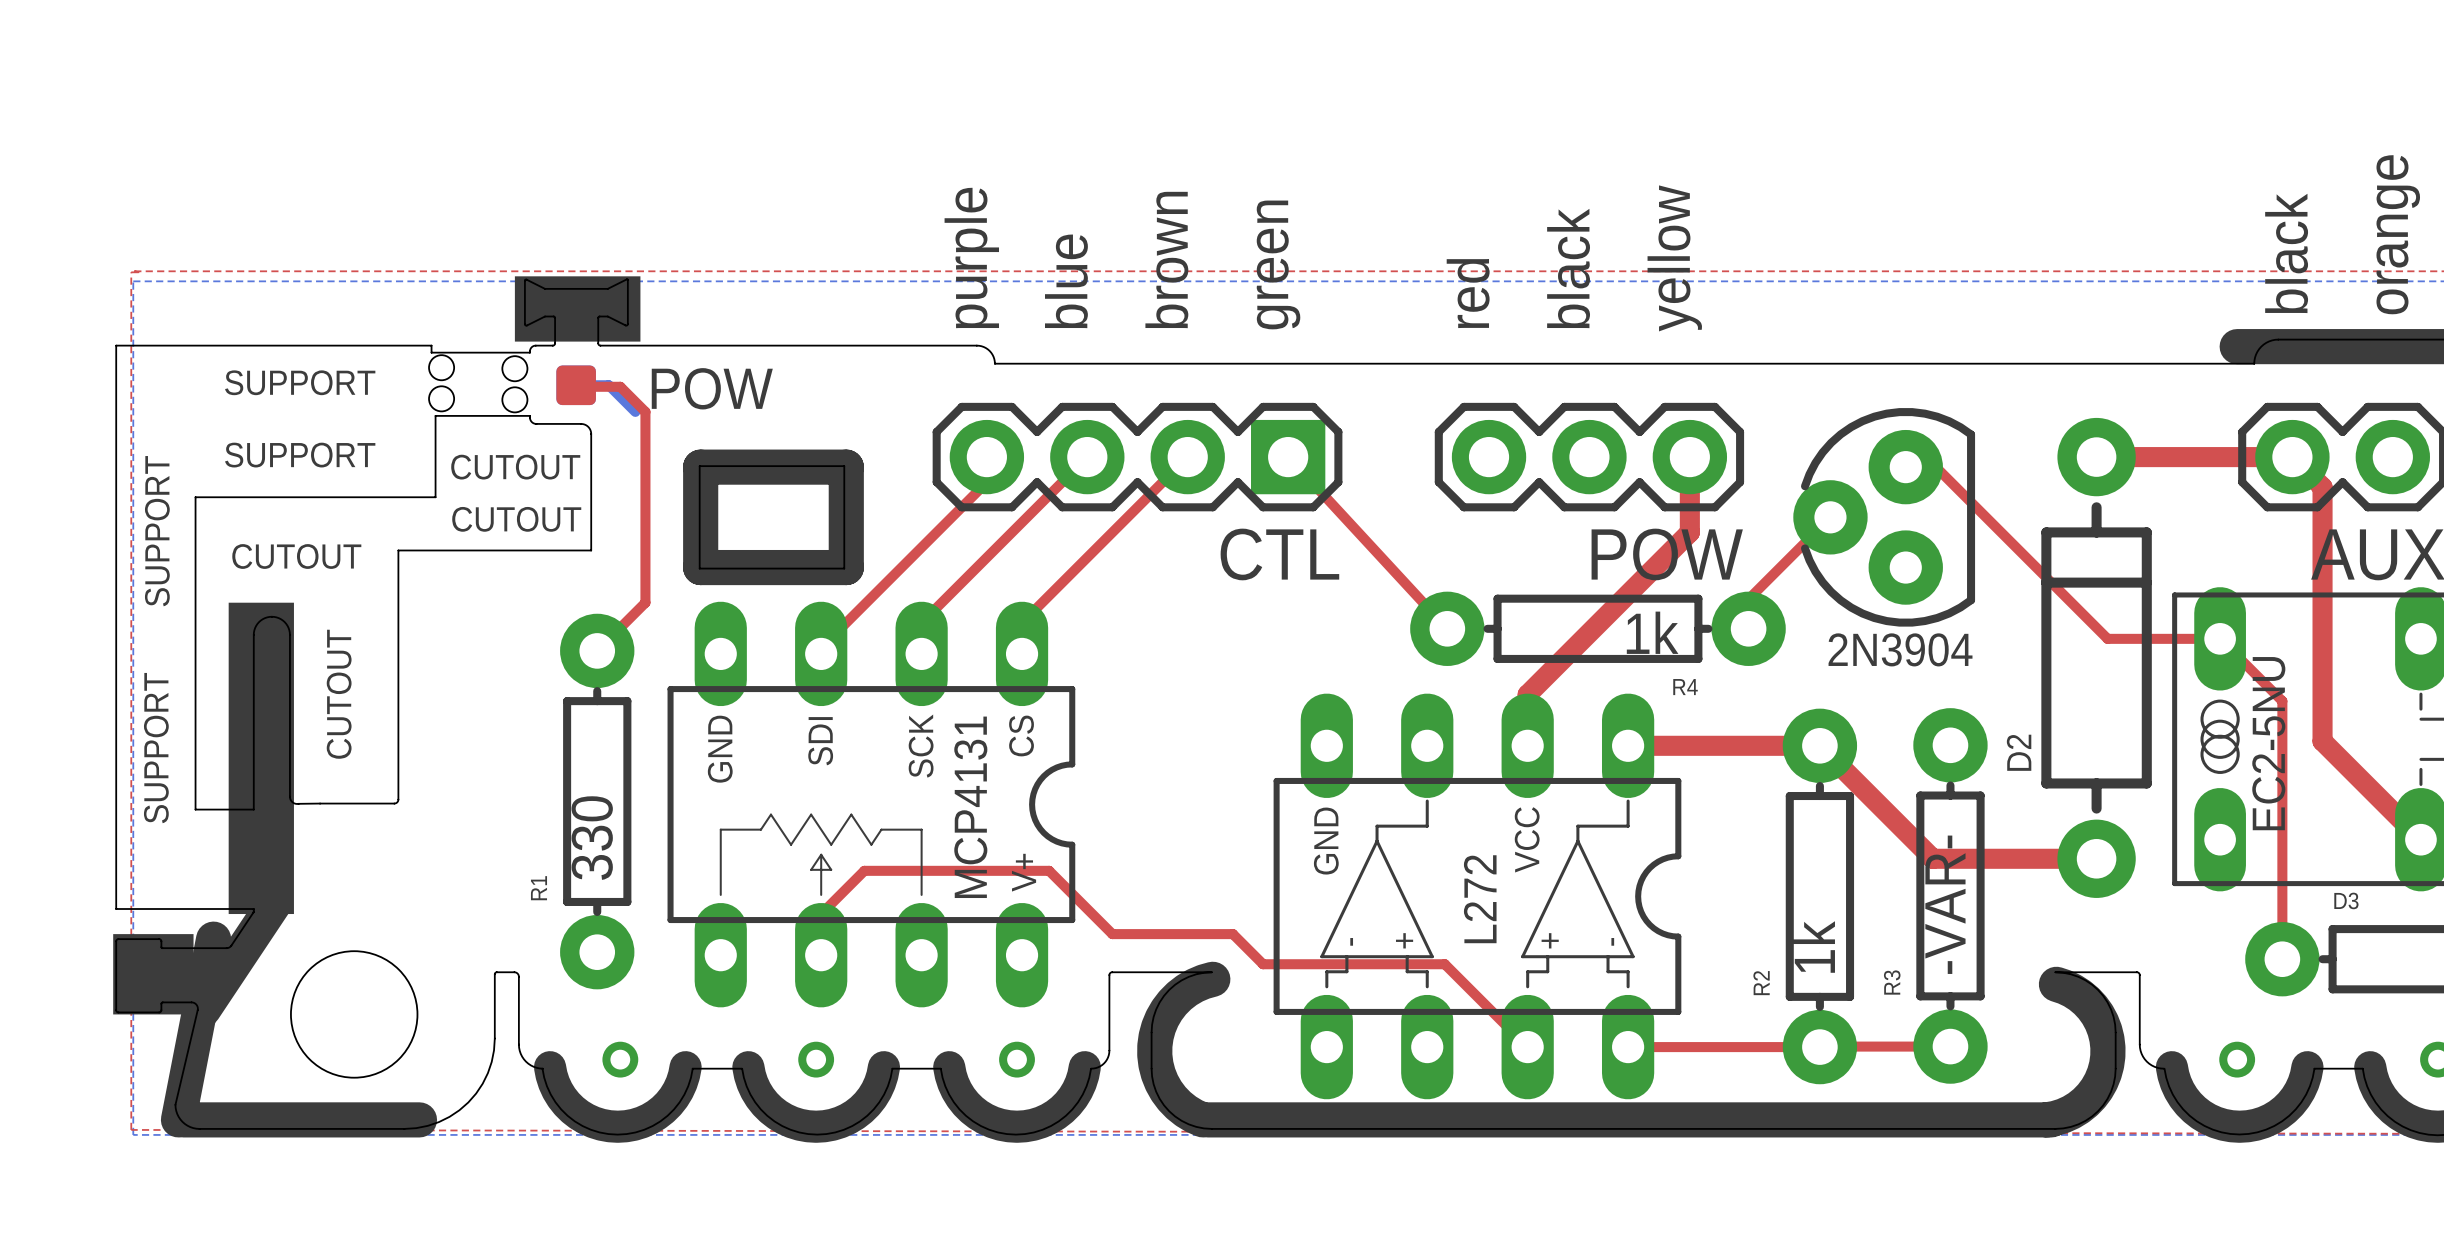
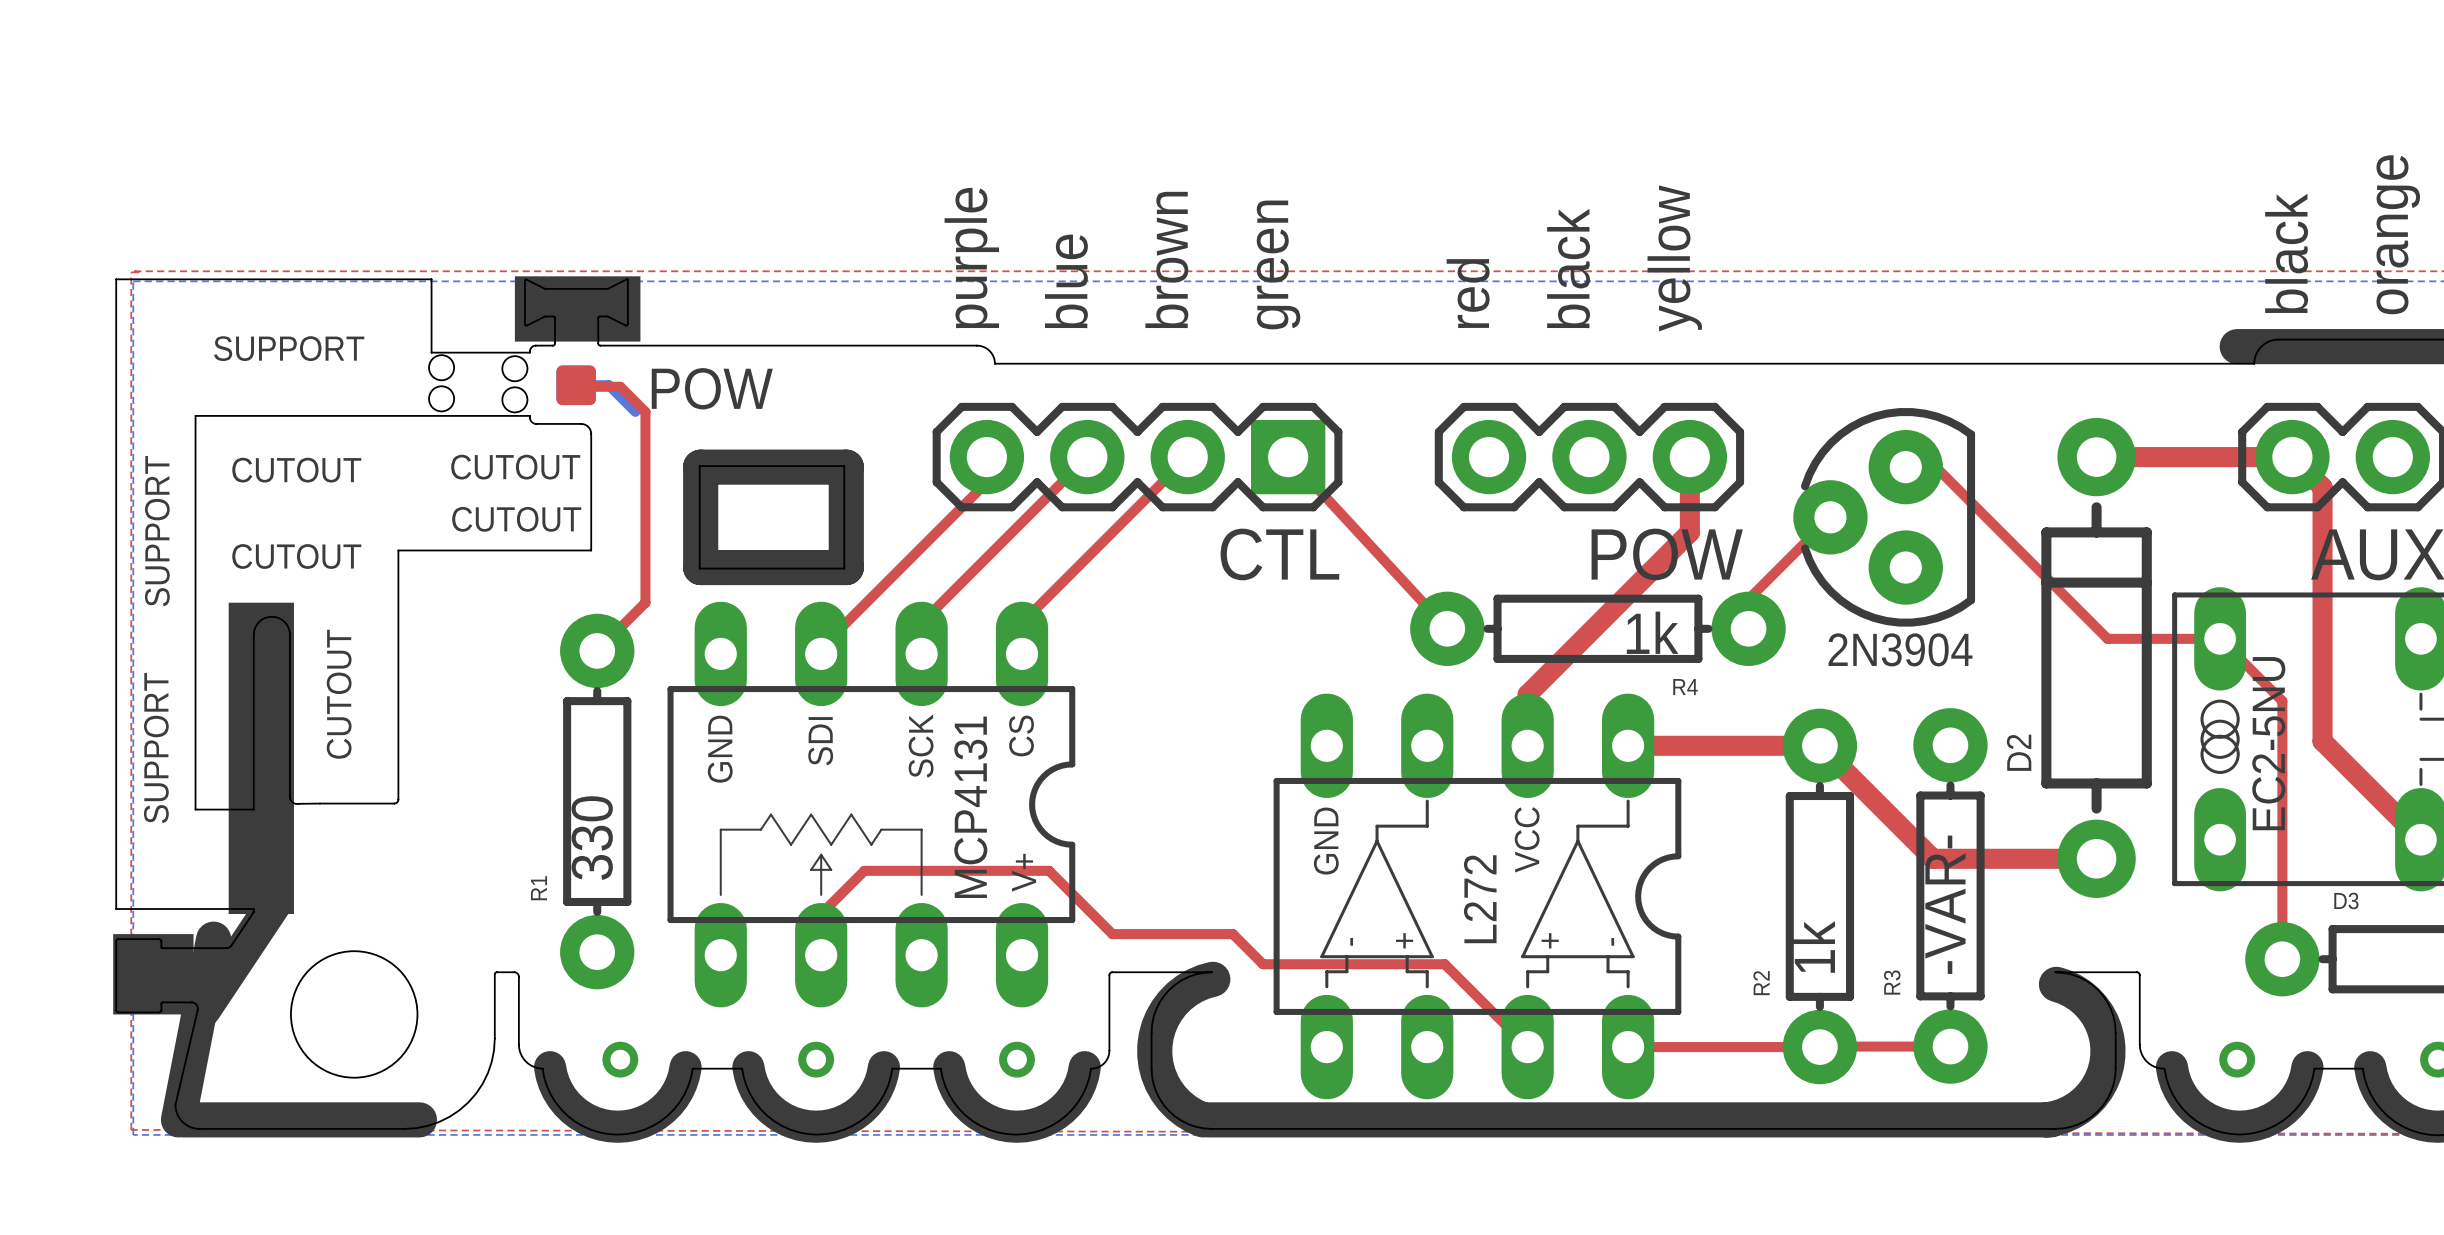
board edge: (116, 345) (431, 345) -> (116, 345) (116, 279) (431, 279) (431, 345)
text position: SUPPORT (300, 382) -> SUPPORT (289, 348)
board edge: (435, 415) (435, 497) (195, 497) -> (435, 415) (195, 415) (195, 497)
text: SUPPORT (300, 455) -> CUTOUT (296, 470)

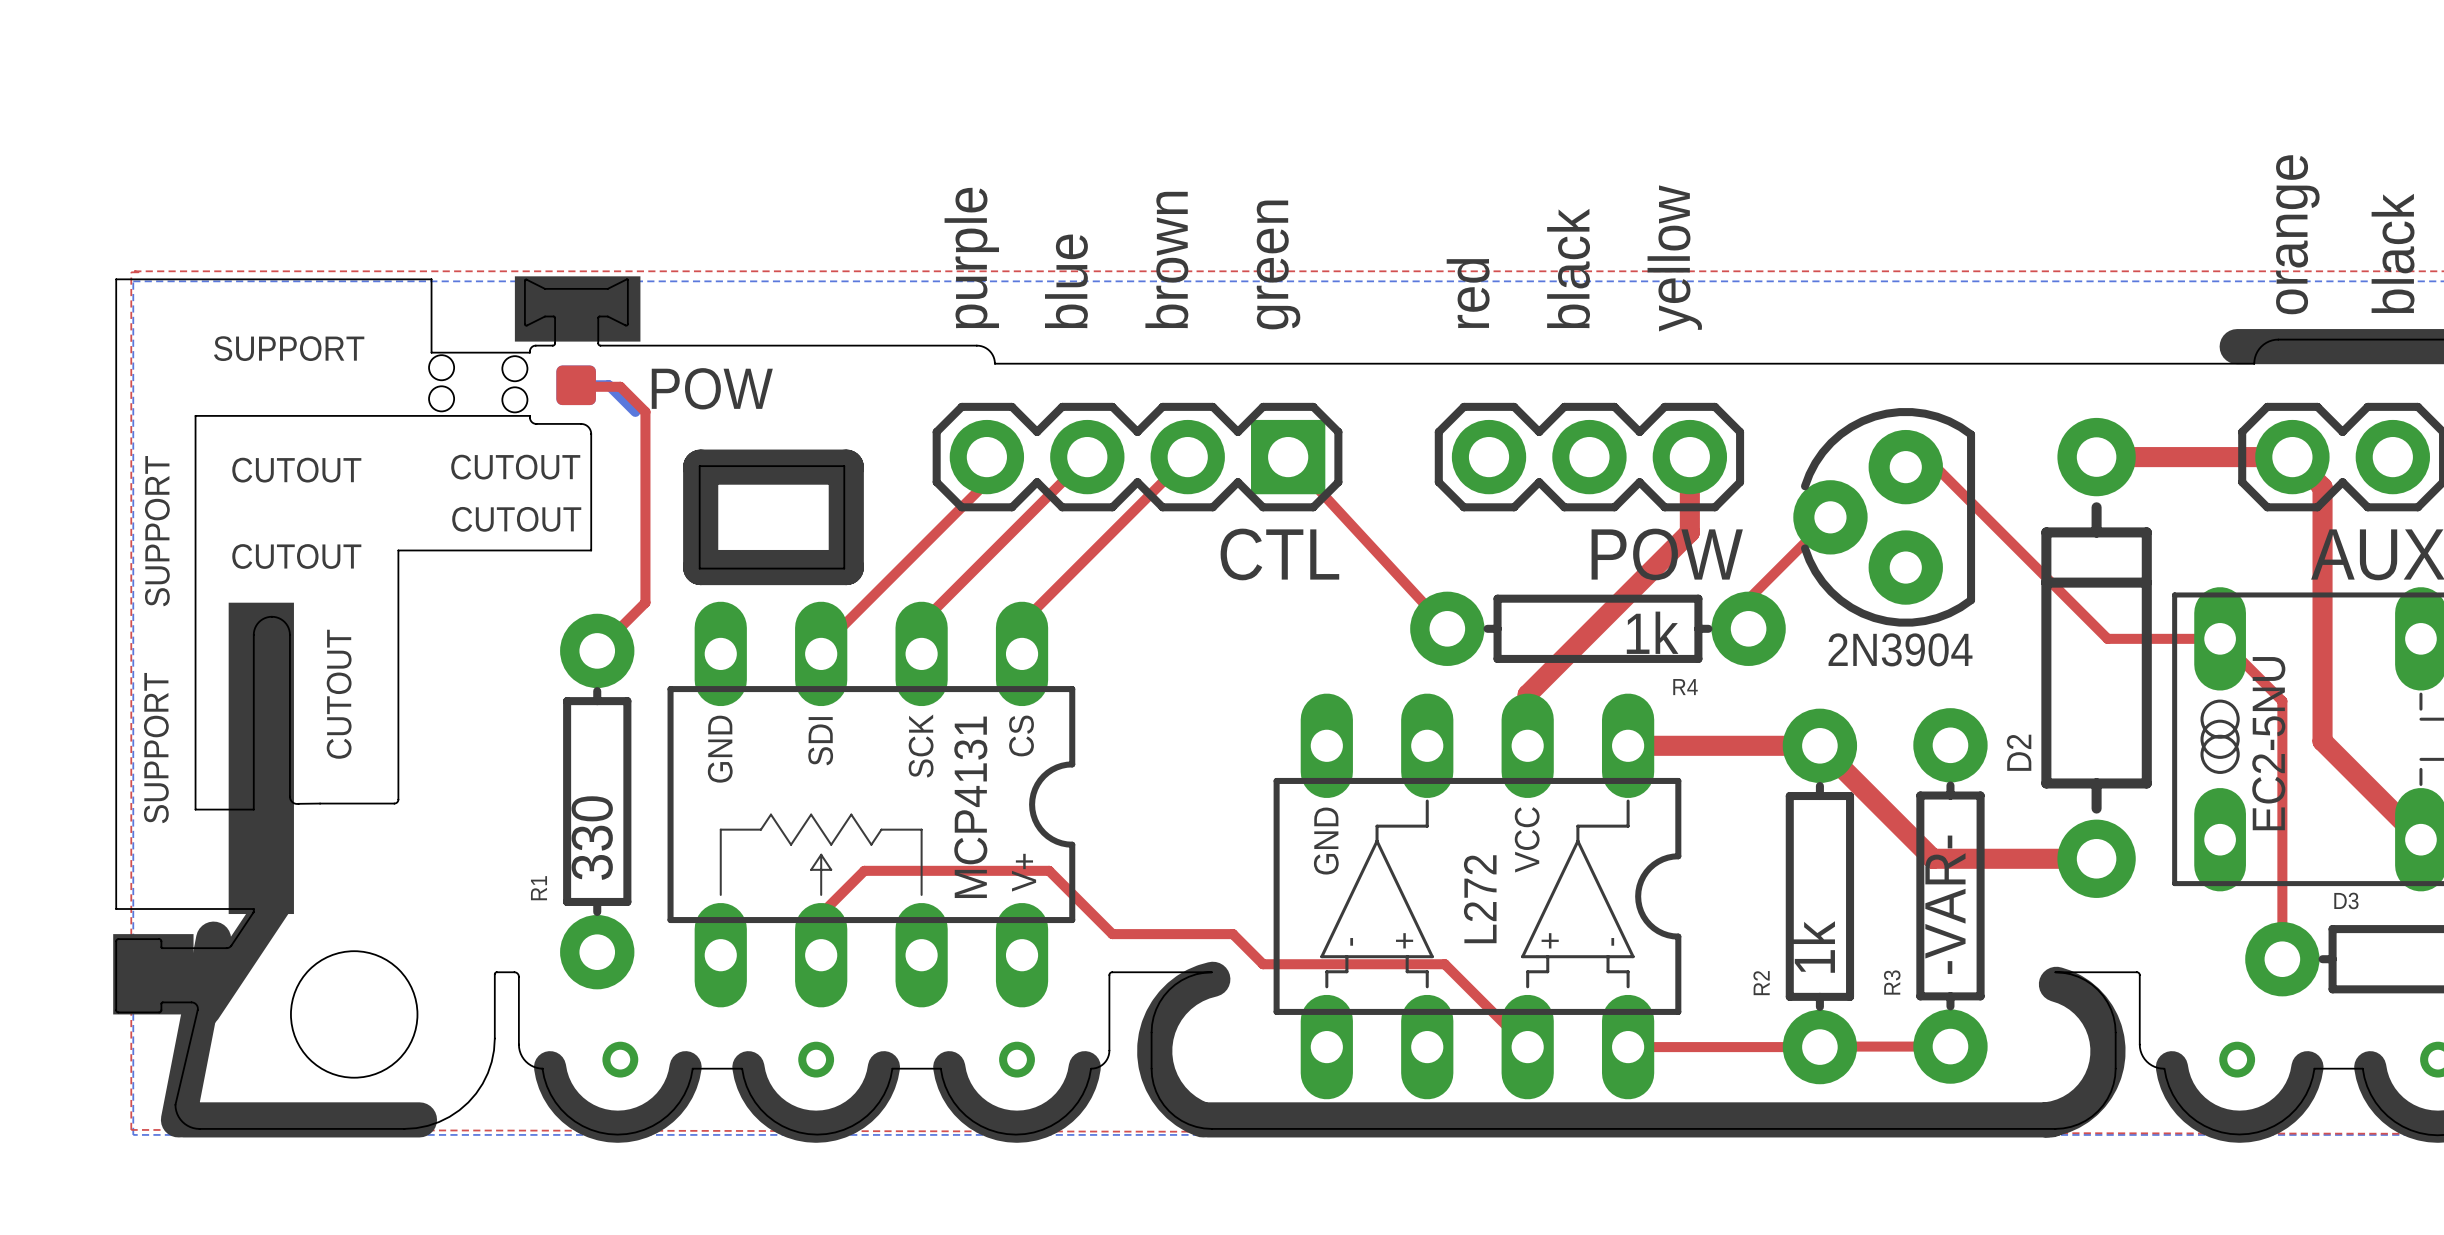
text: orange (2398, 234) -> black (2393, 253)
text: black (2286, 253) -> orange (2297, 234)

